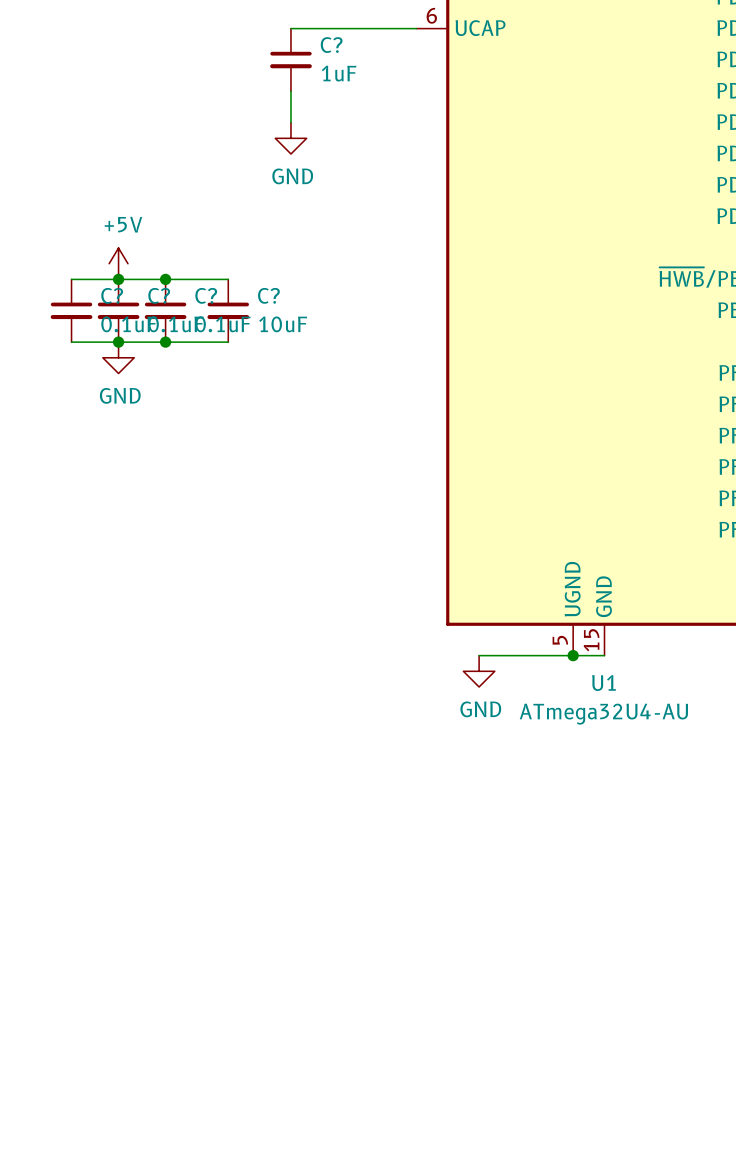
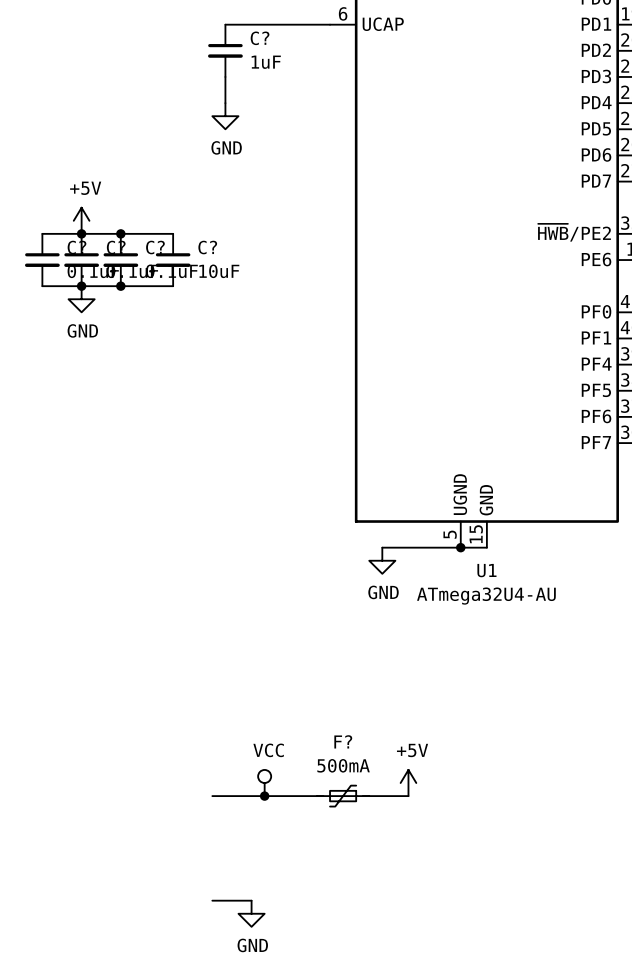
power symbol: none -> VCC (264, 783)
power symbol: none -> +5V (408, 783)
wire: none -> (212, 796) (316, 796)
junction: none -> (264, 796)
F?: none -> 500mA (343, 796)
wire: none -> (369, 796) (408, 796)
wire: none -> (212, 900) (251, 900)
power symbol: none -> GND (251, 913)

